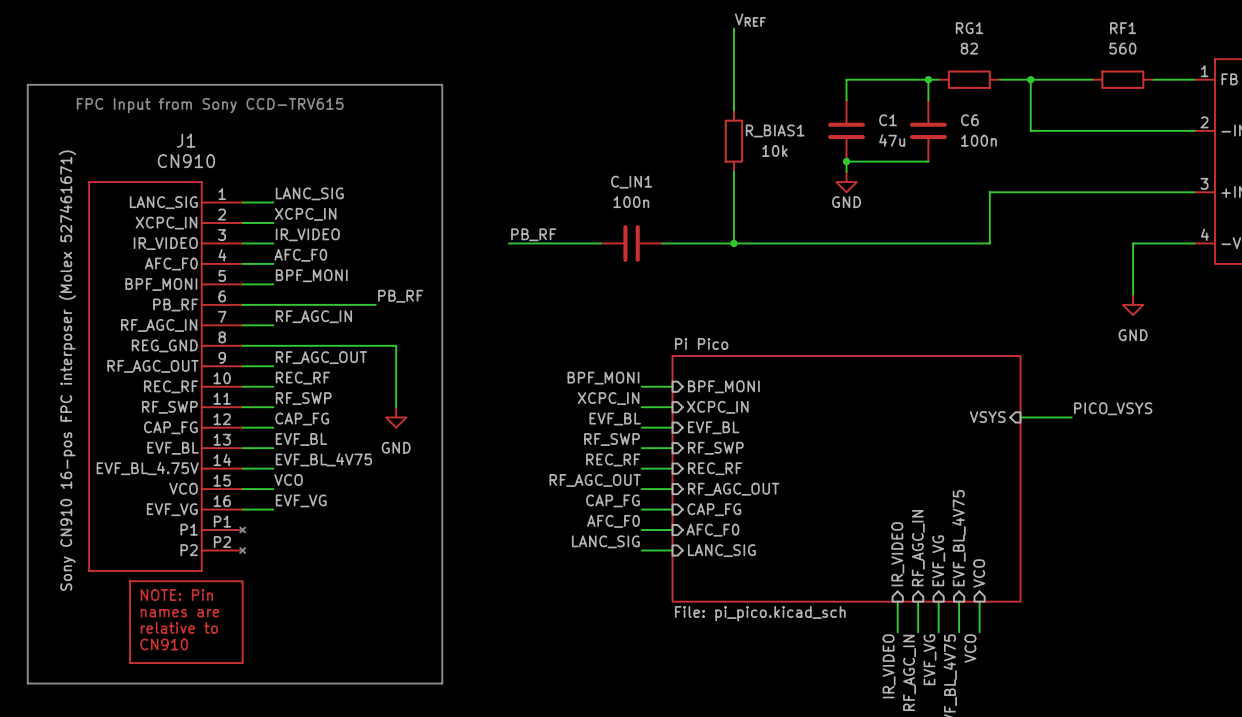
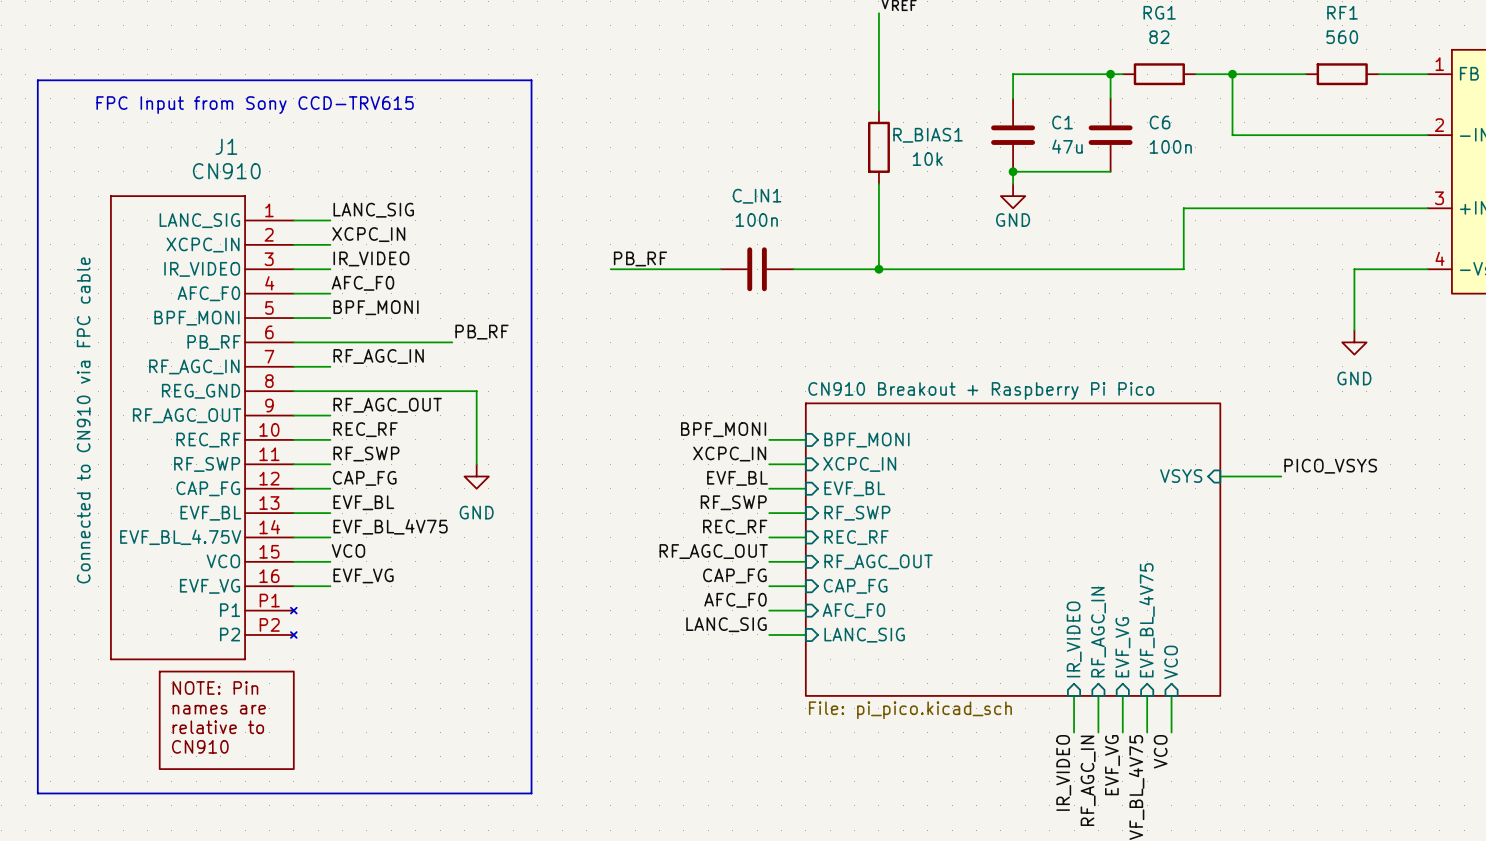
sheet Pi Pico name: Pi Pico (701, 343) -> CN910 Breakout + Raspberry Pi Pico (981, 390)
J1 text: Sony CN910 16-pos FPC interposer (Molex 527461671) (67, 370) -> Connected to CN910 via FPC cable (83, 420)

